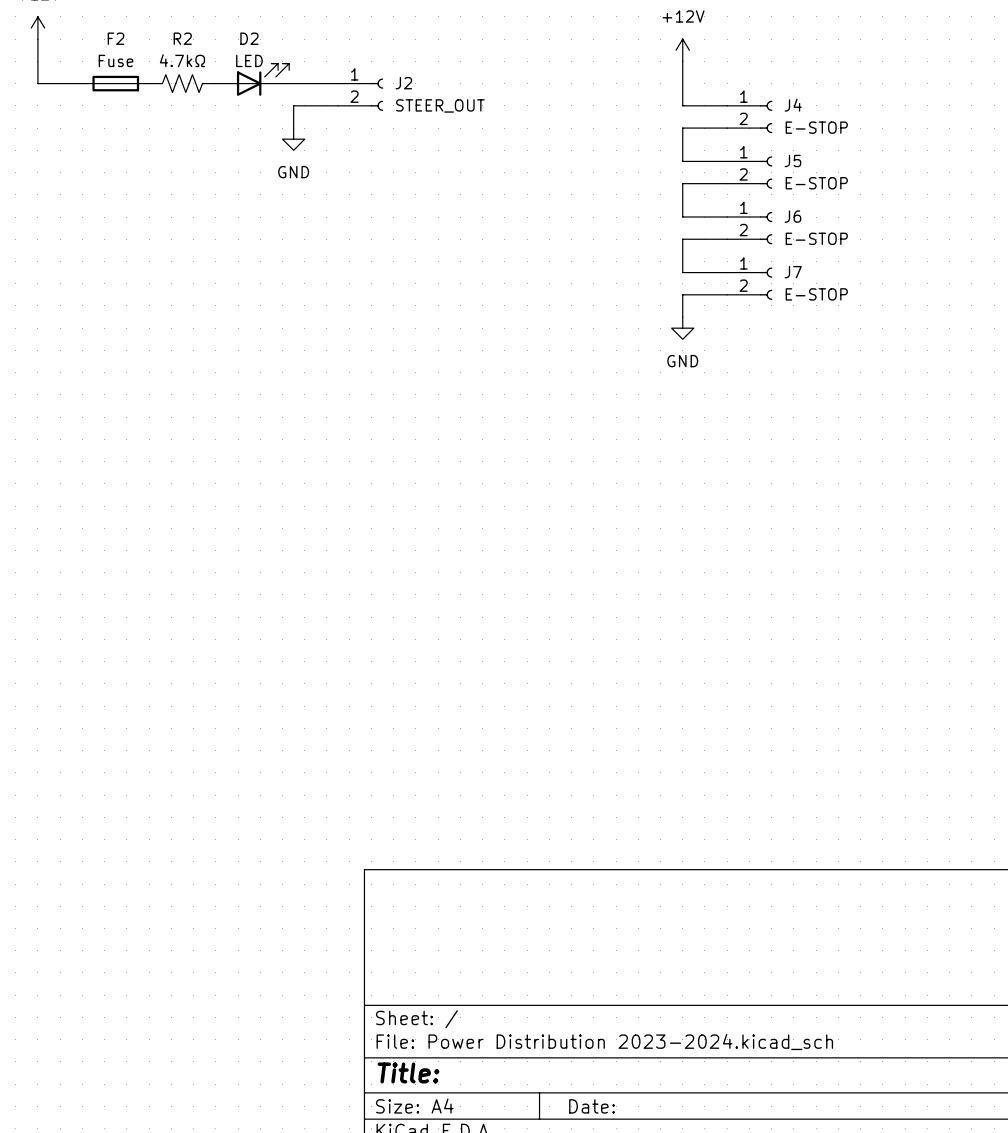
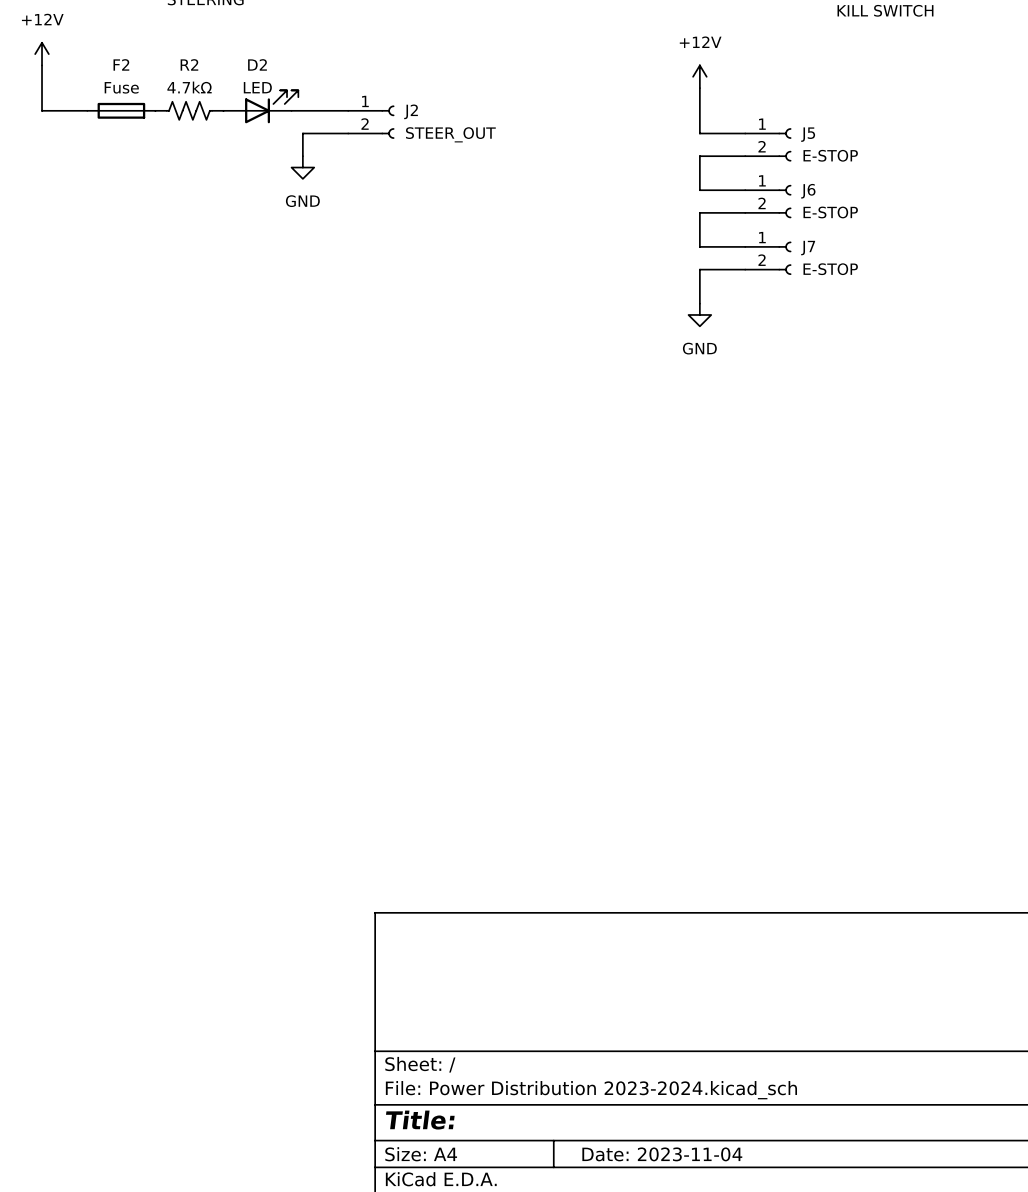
J4 name: J4 (793, 105) -> J5 (808, 134)
J5 name: J5 (792, 160) -> J6 (808, 191)
J6 name: J6 (792, 216) -> J7 (808, 248)
wire: (682, 272) (727, 272) -> none
J7: E-STOP (749, 283) -> none
wire: (727, 294) (682, 294) (682, 317) -> none
power symbol position: GND (682, 328) -> GND (699, 314)
title block: Date: (591, 1106) -> Date: 2023-11-04 (662, 1154)

